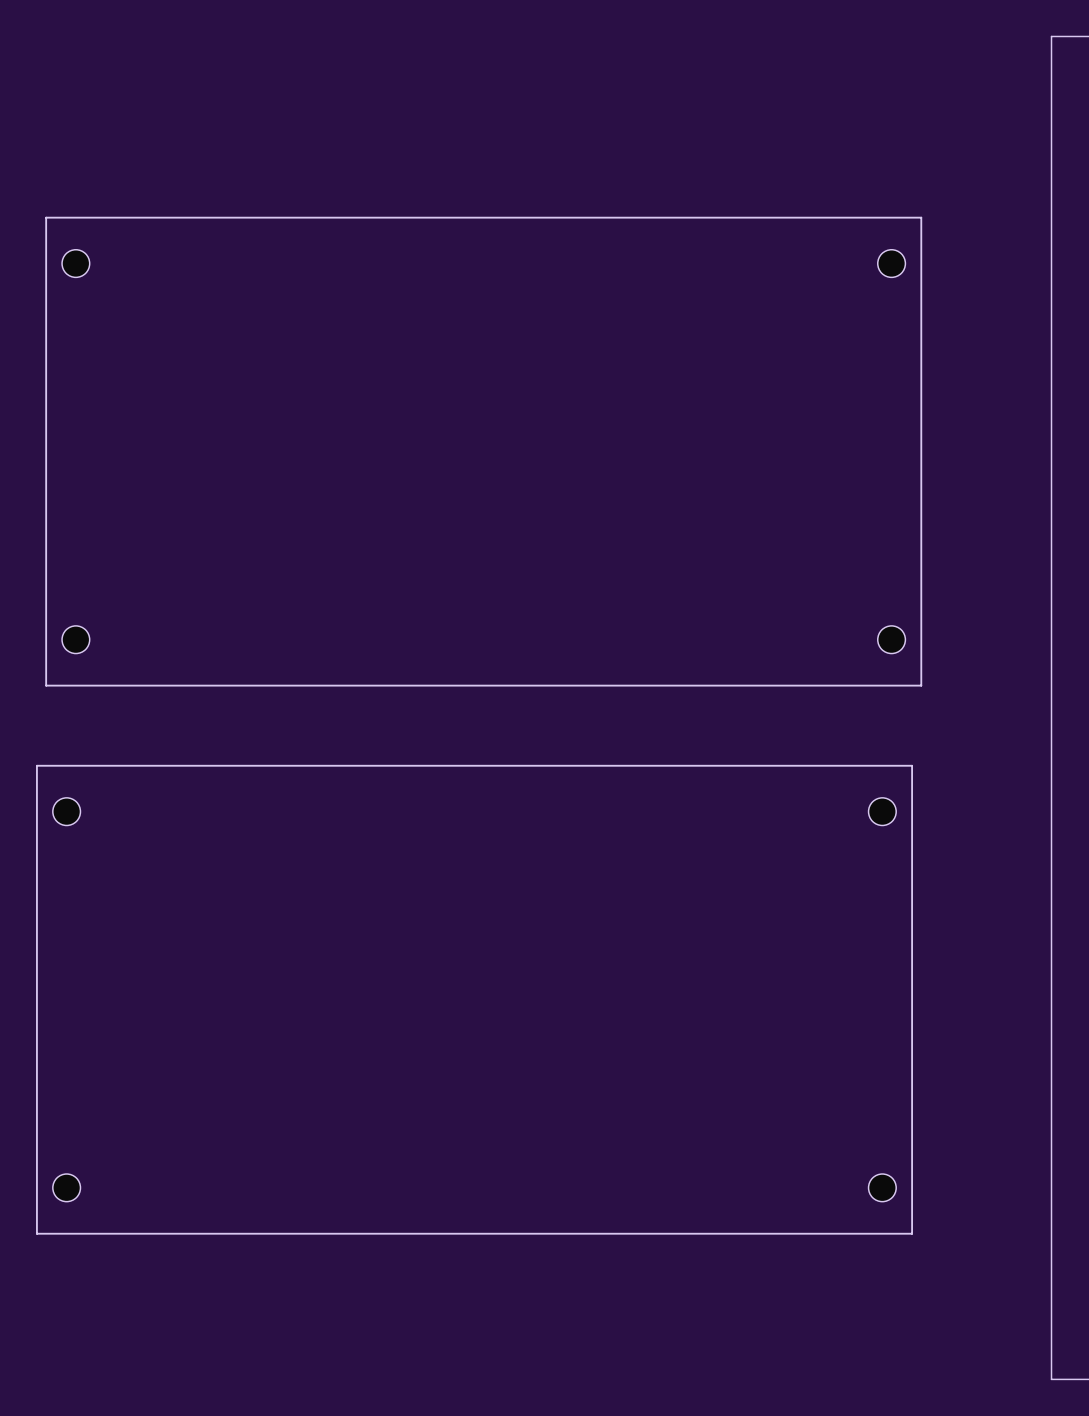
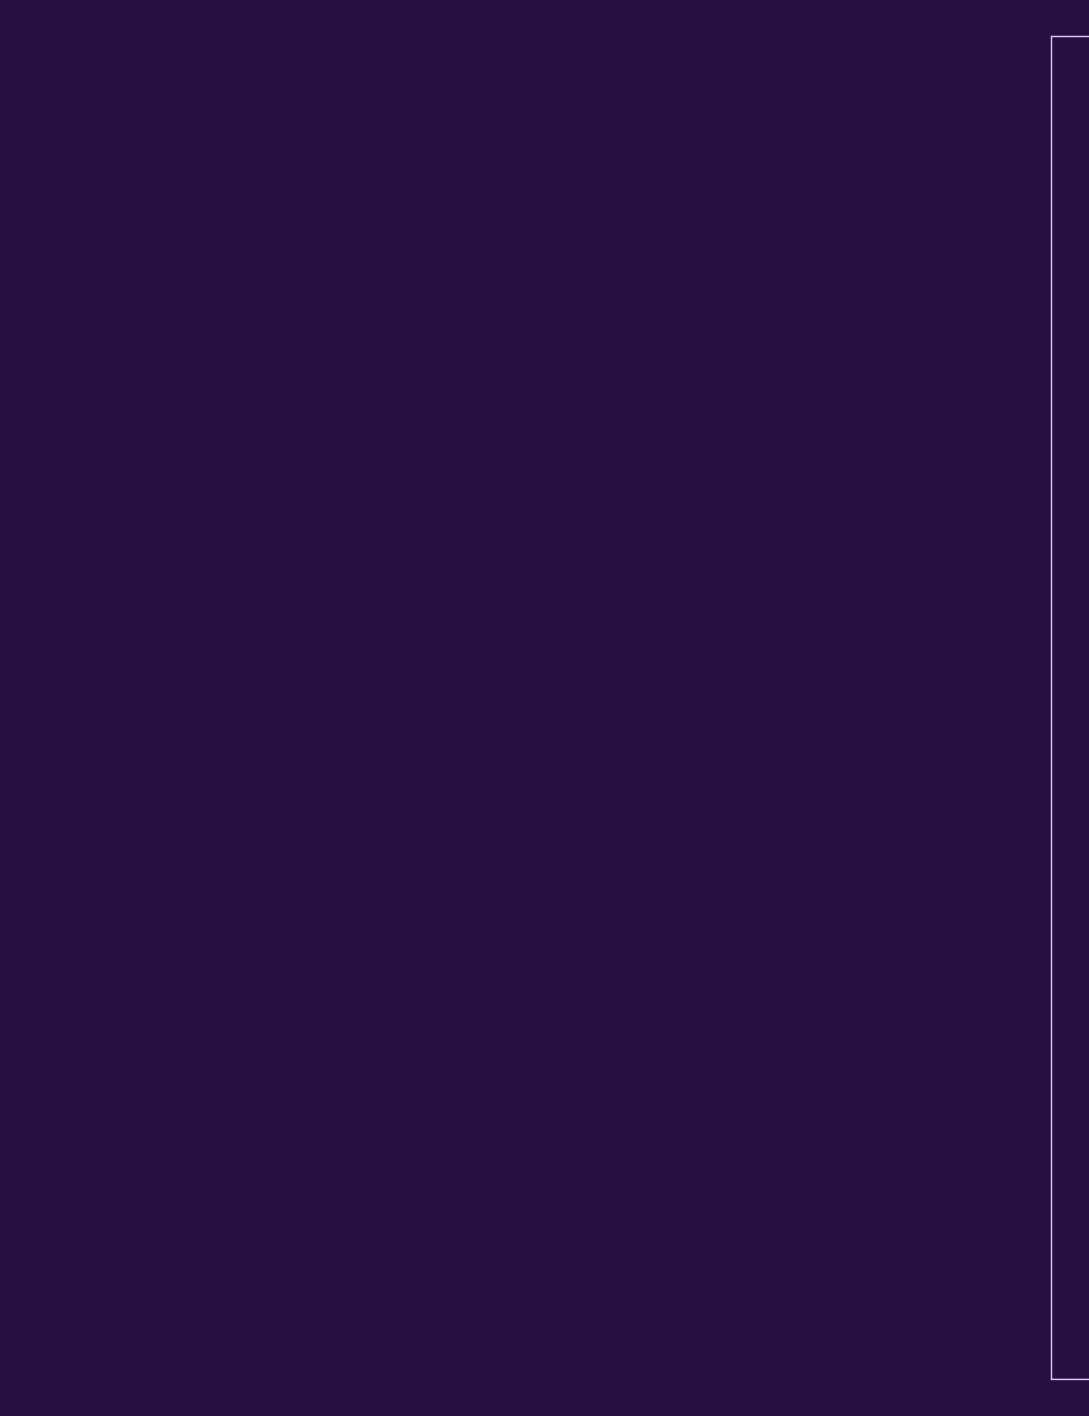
board edge: (921, 217) (46, 217) (46, 685) (921, 685) (921, 217) -> none
part: (75, 263) -> none
part: (891, 263) -> none
part: (75, 639) -> none
part: (891, 639) -> none
board edge: (912, 765) (36, 765) (36, 1233) (912, 1233) (912, 765) -> none
part: (66, 811) -> none
part: (882, 811) -> none
part: (66, 1187) -> none
part: (882, 1187) -> none

